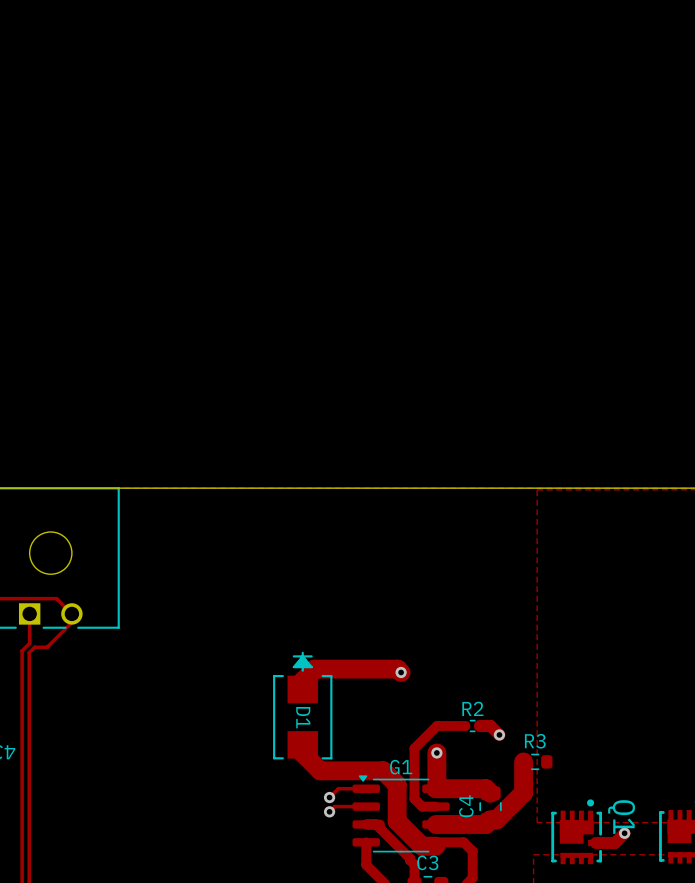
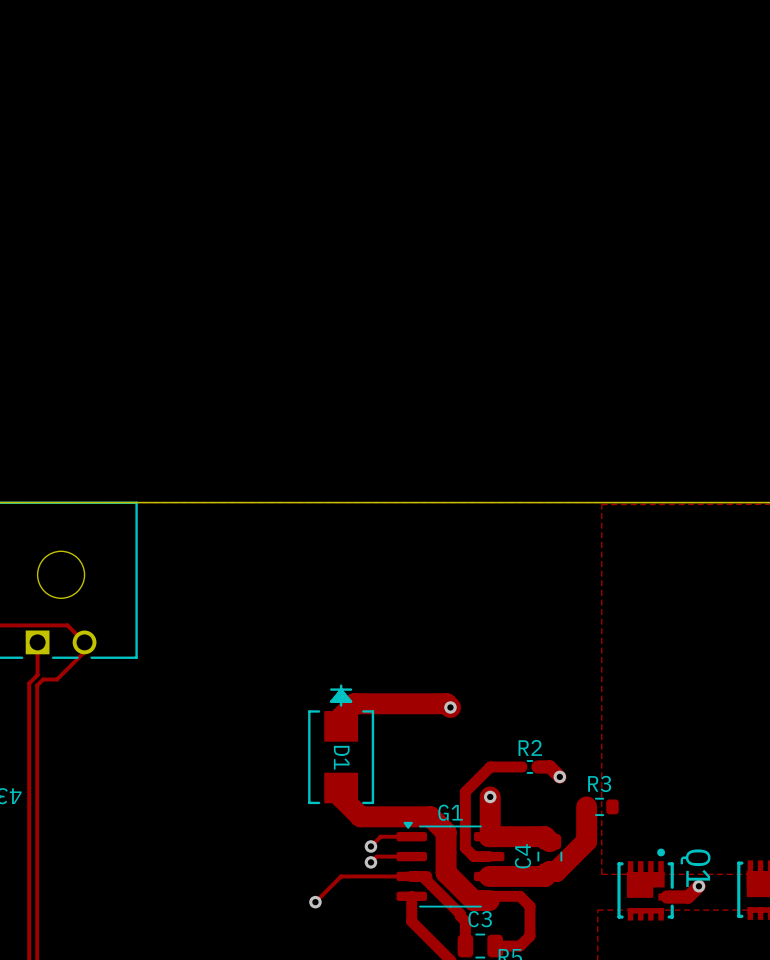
track: none -> (411, 876) (341, 876) (315, 902)
via: none -> (315, 902)

